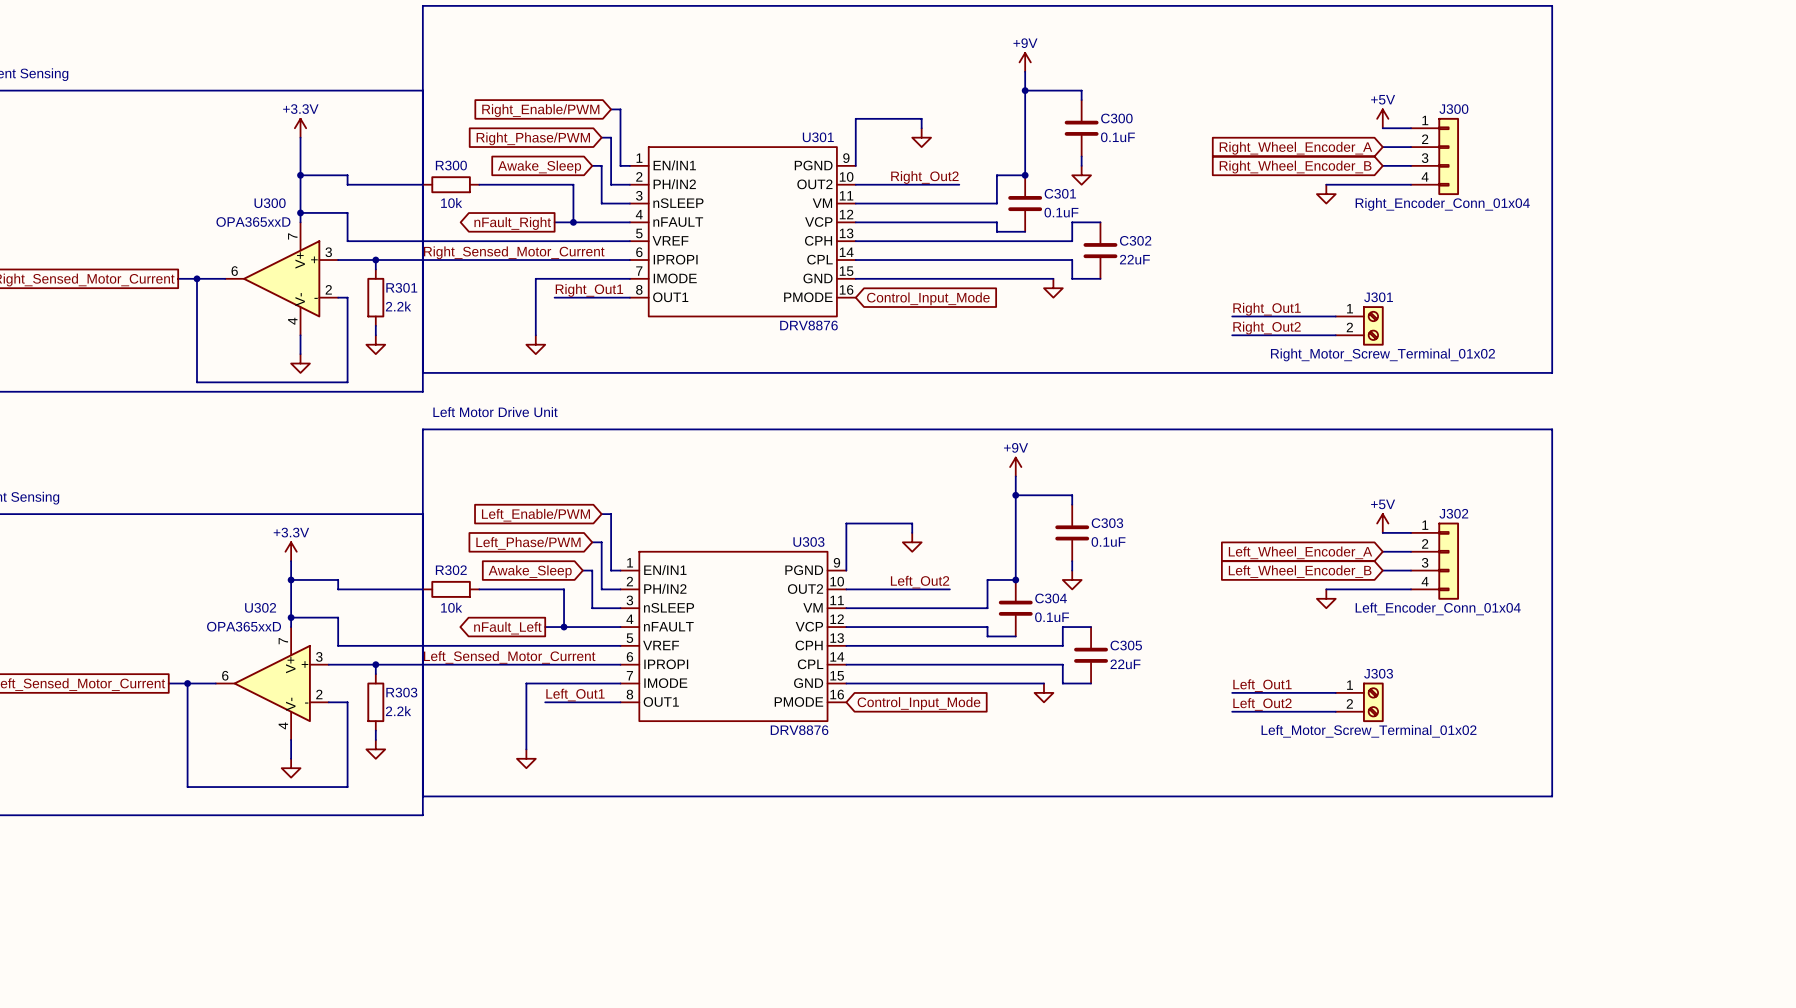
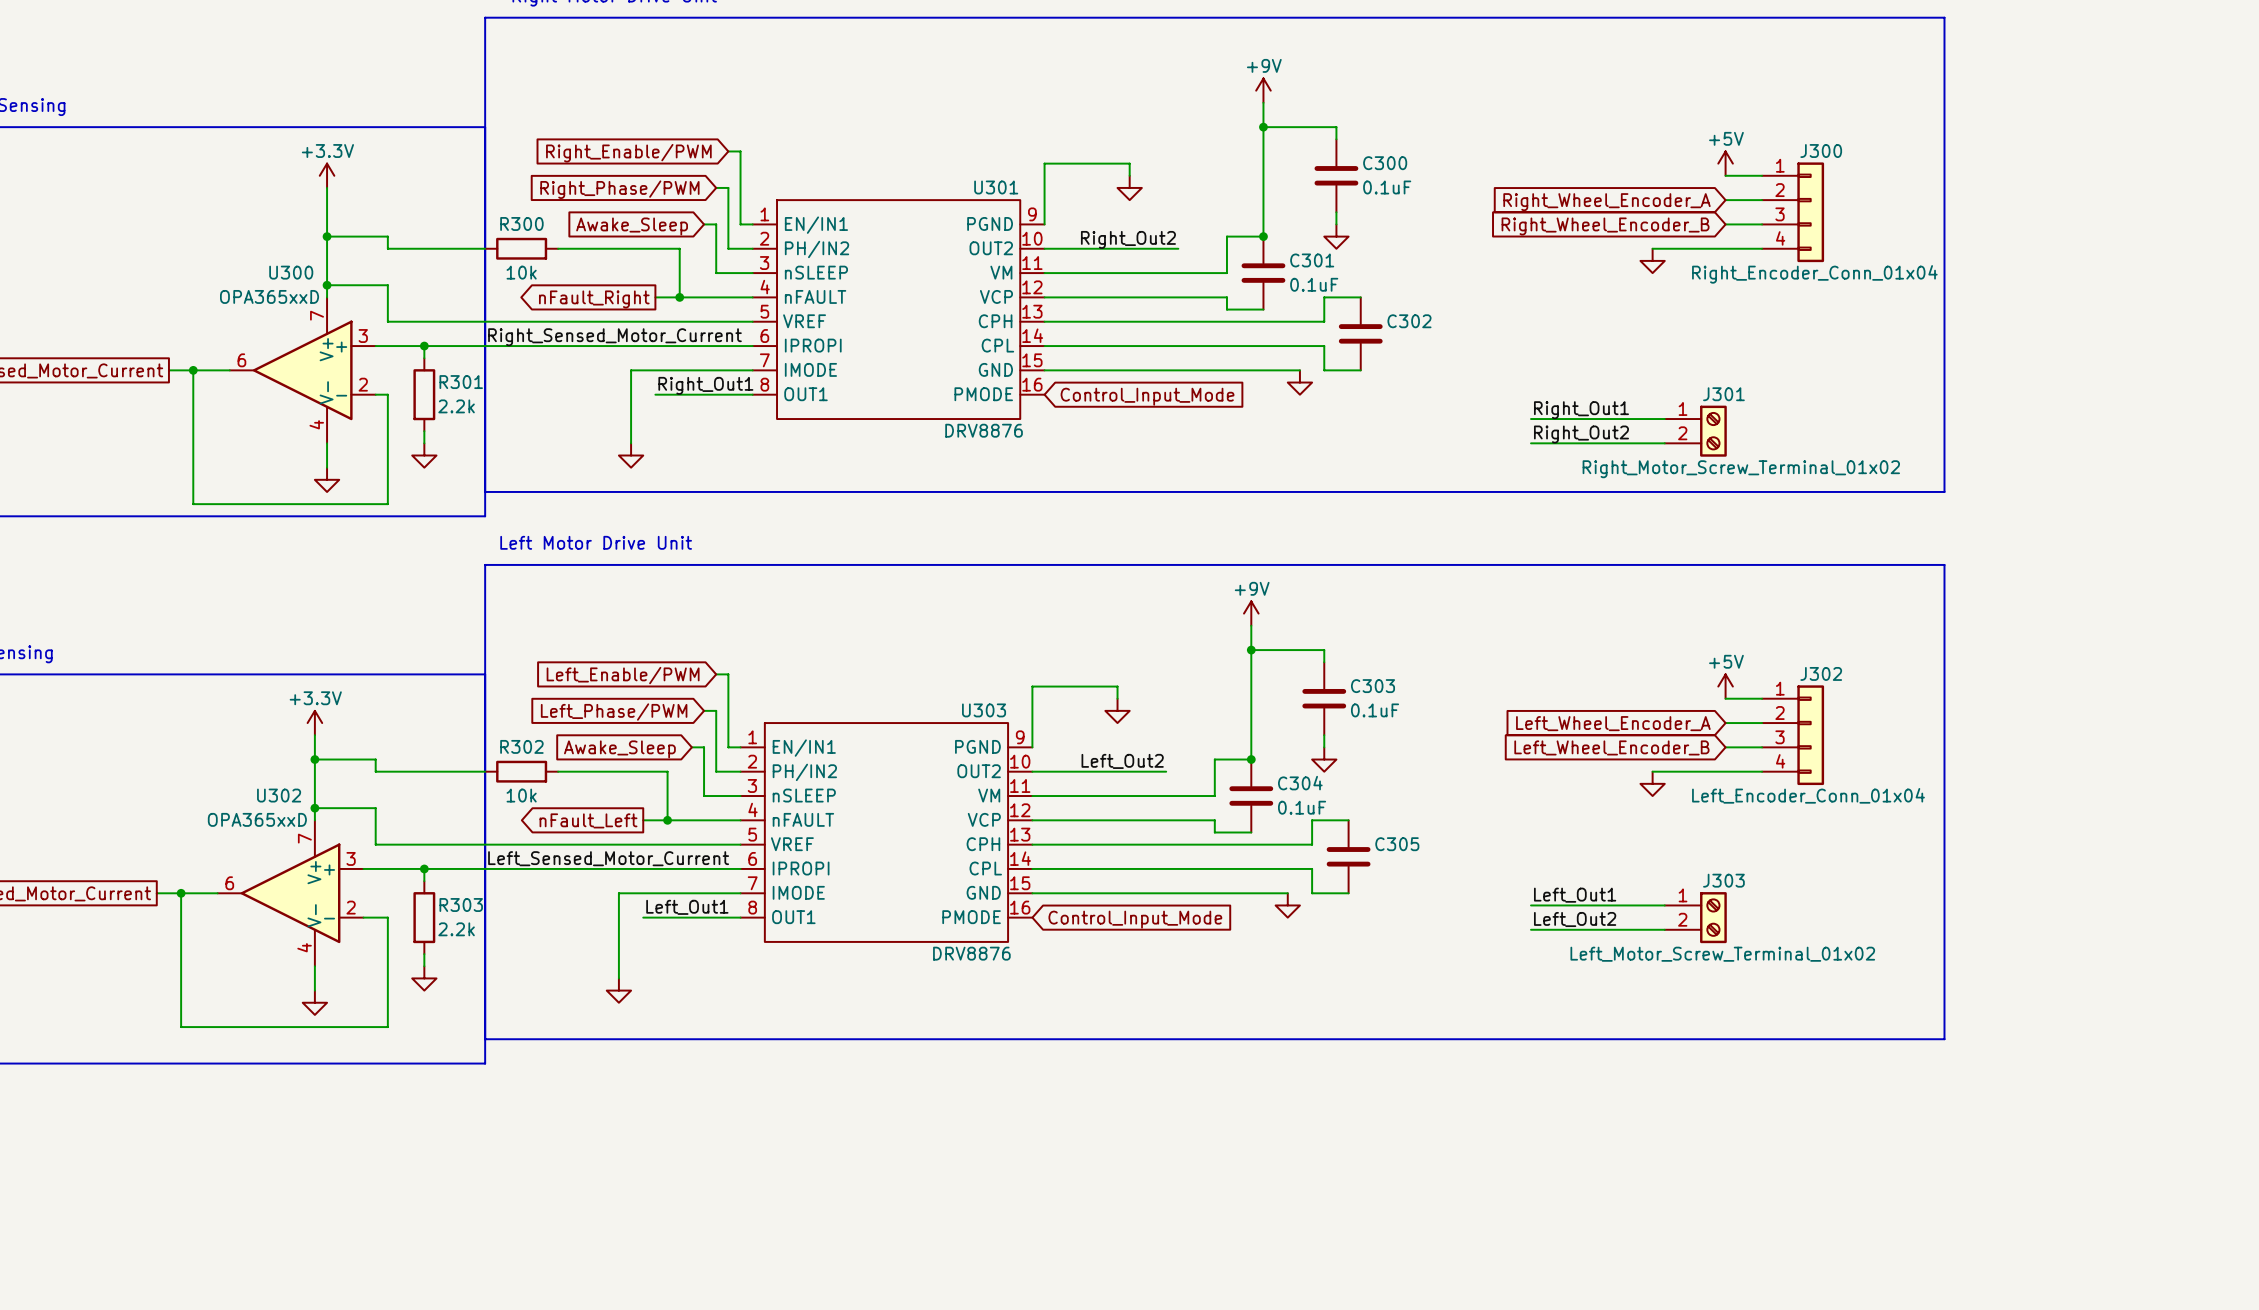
C302 value: 22uF (1134, 259) -> none
C305 value: 22uF (1125, 664) -> none

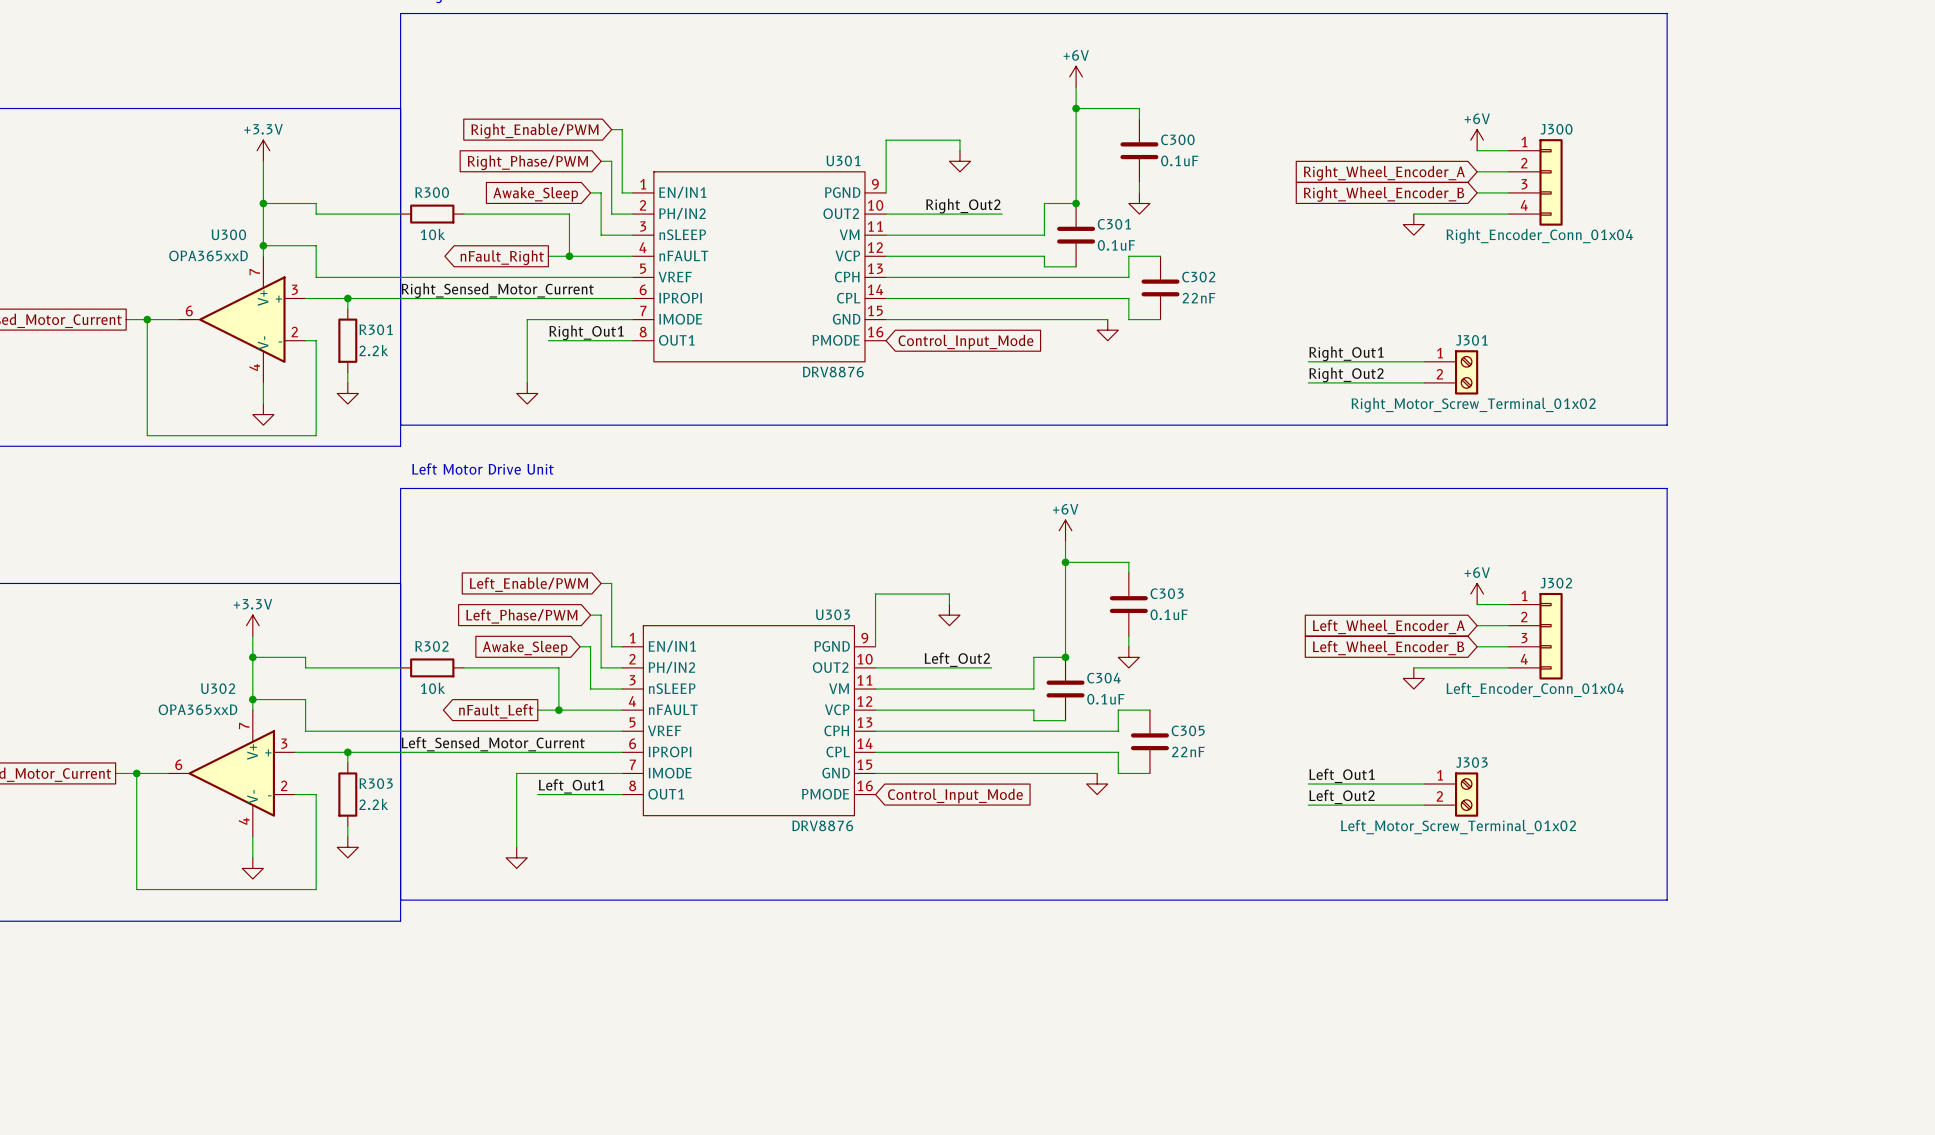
power symbol: +9V (1263, 90) -> +6V (1076, 76)
power symbol: +5V (1725, 163) -> +6V (1477, 140)
C302 value: none -> 22nF (1198, 298)
power symbol: +9V (1251, 613) -> +6V (1065, 530)
power symbol: +5V (1725, 686) -> +6V (1477, 594)
C305 value: none -> 22nF (1188, 751)

